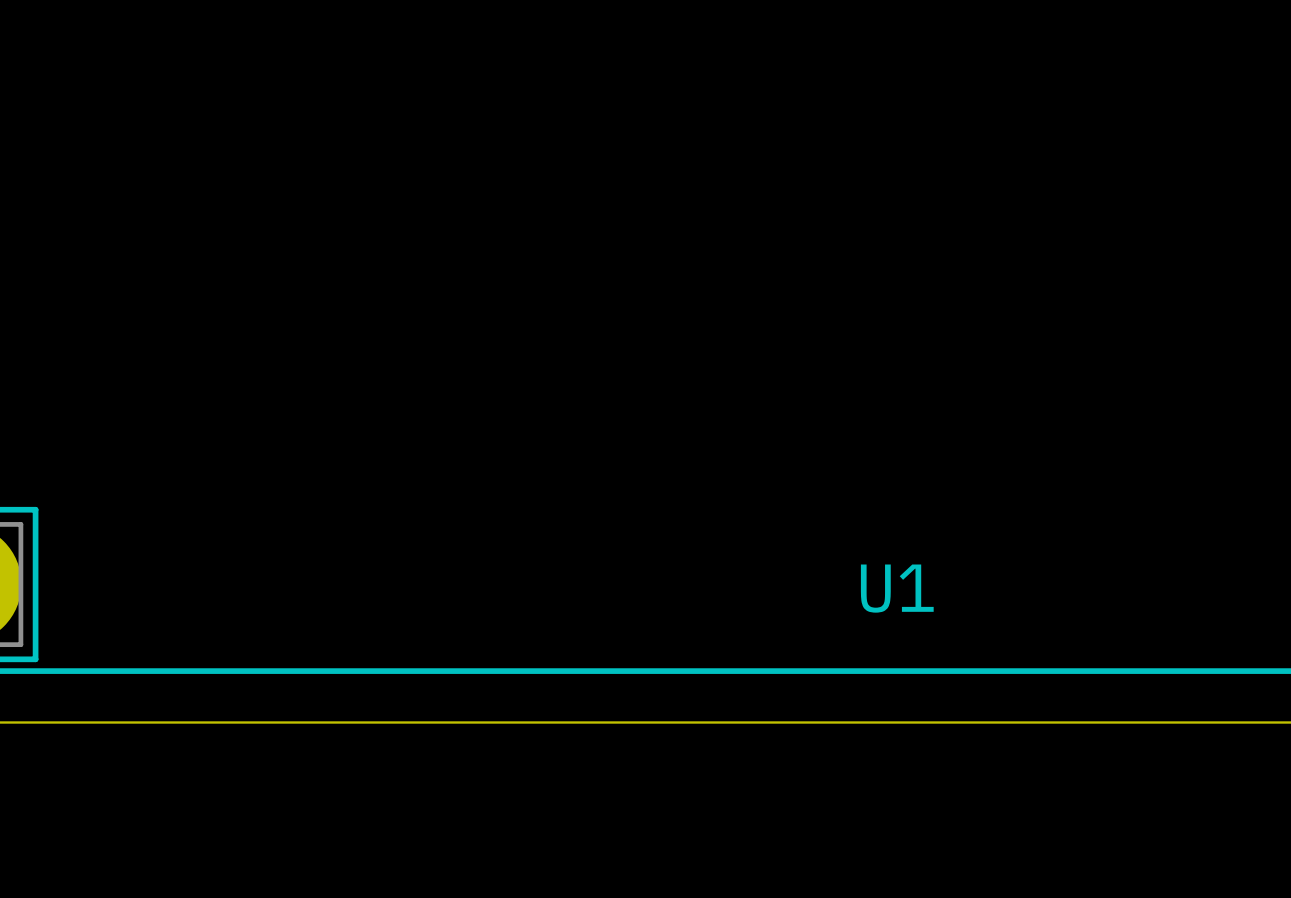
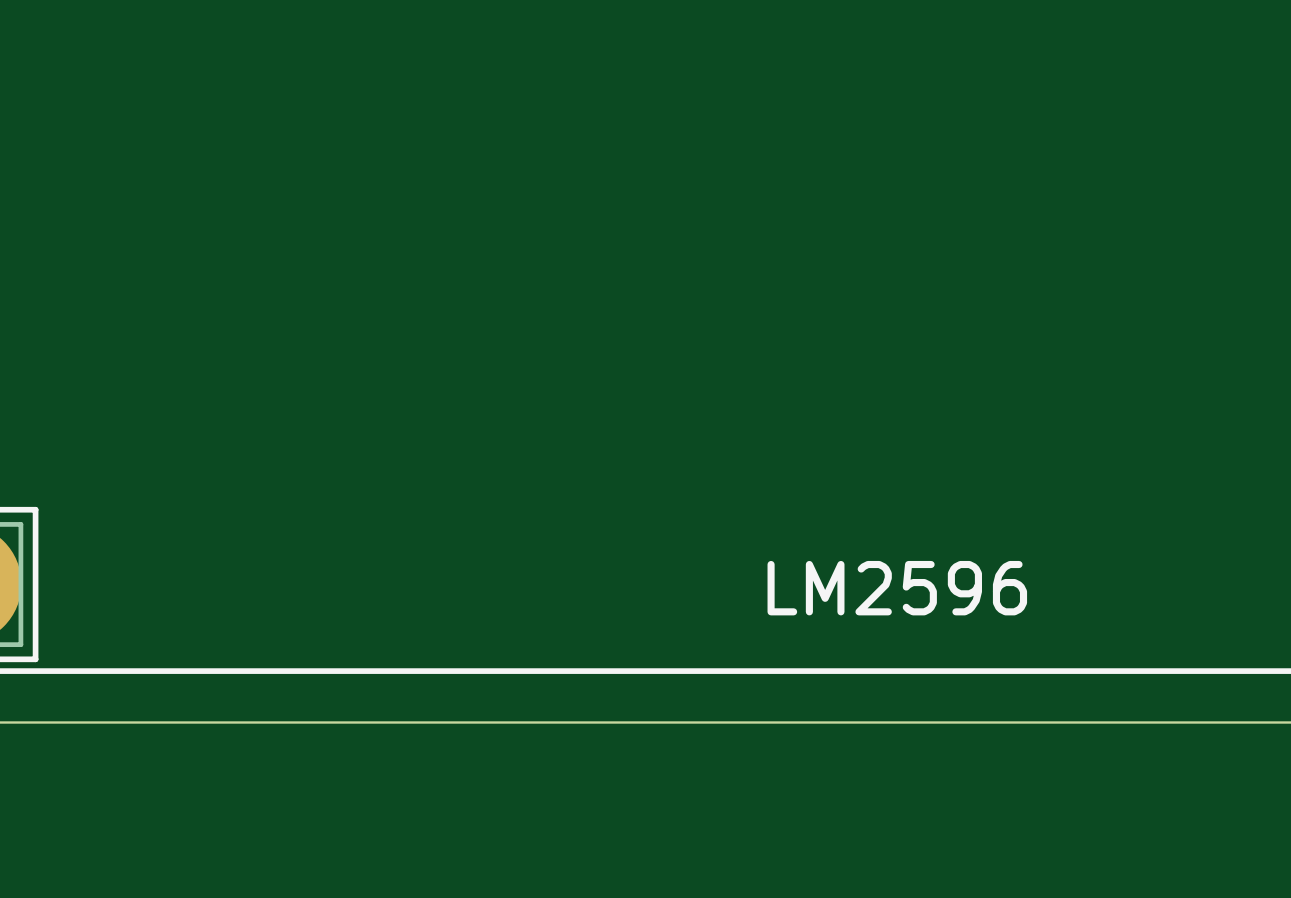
U1 name: U1 (897, 588) -> LM2596 (897, 588)

